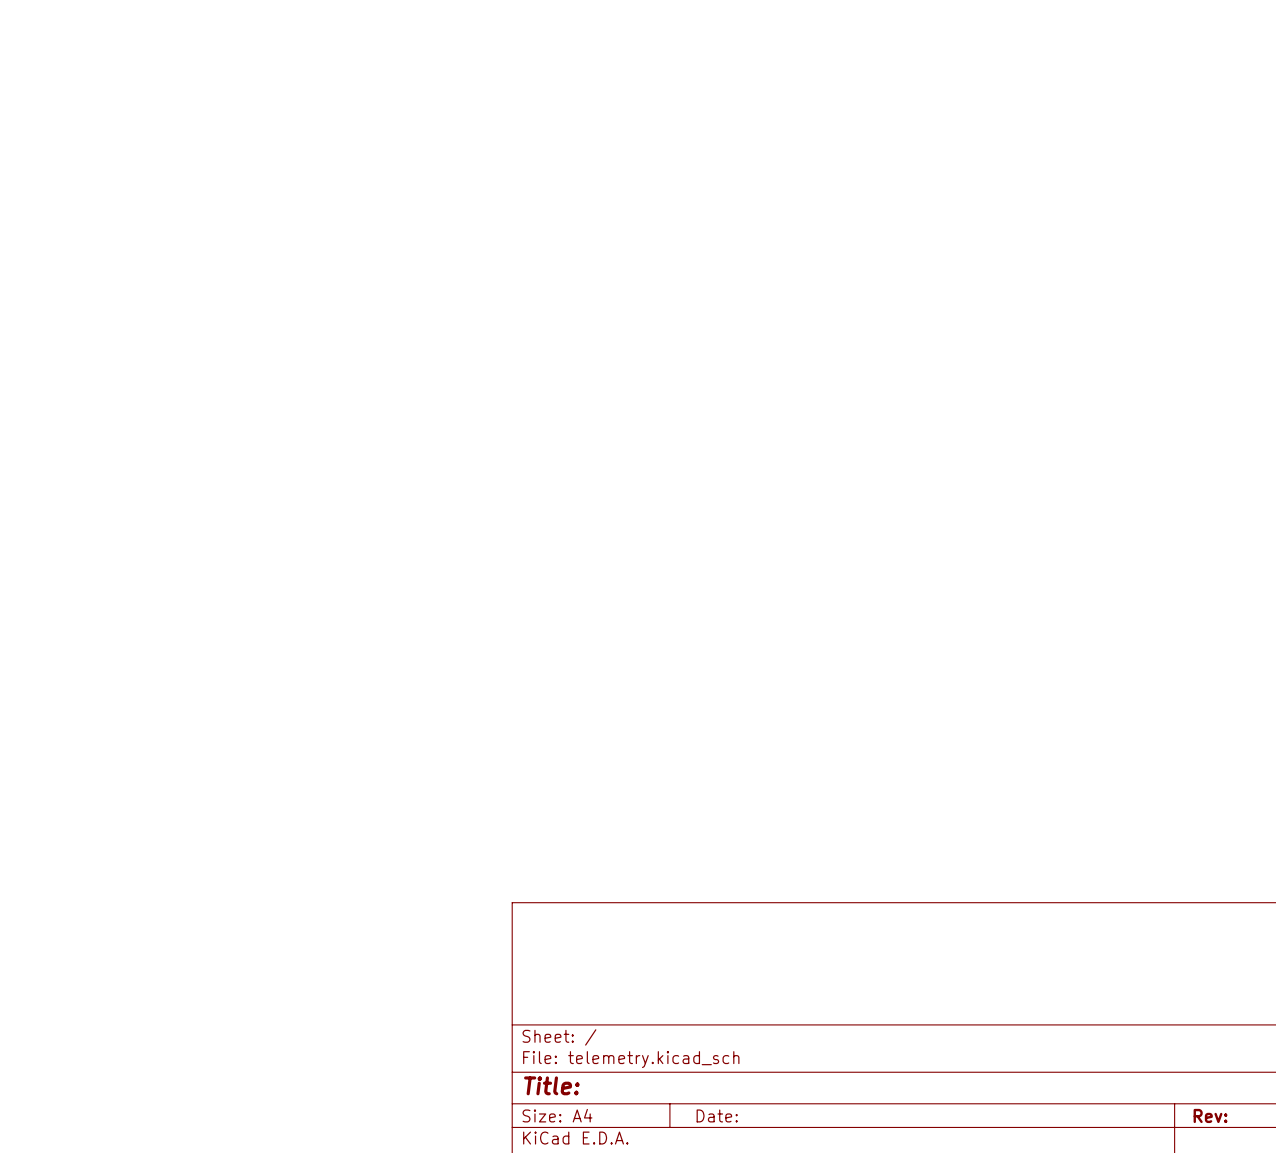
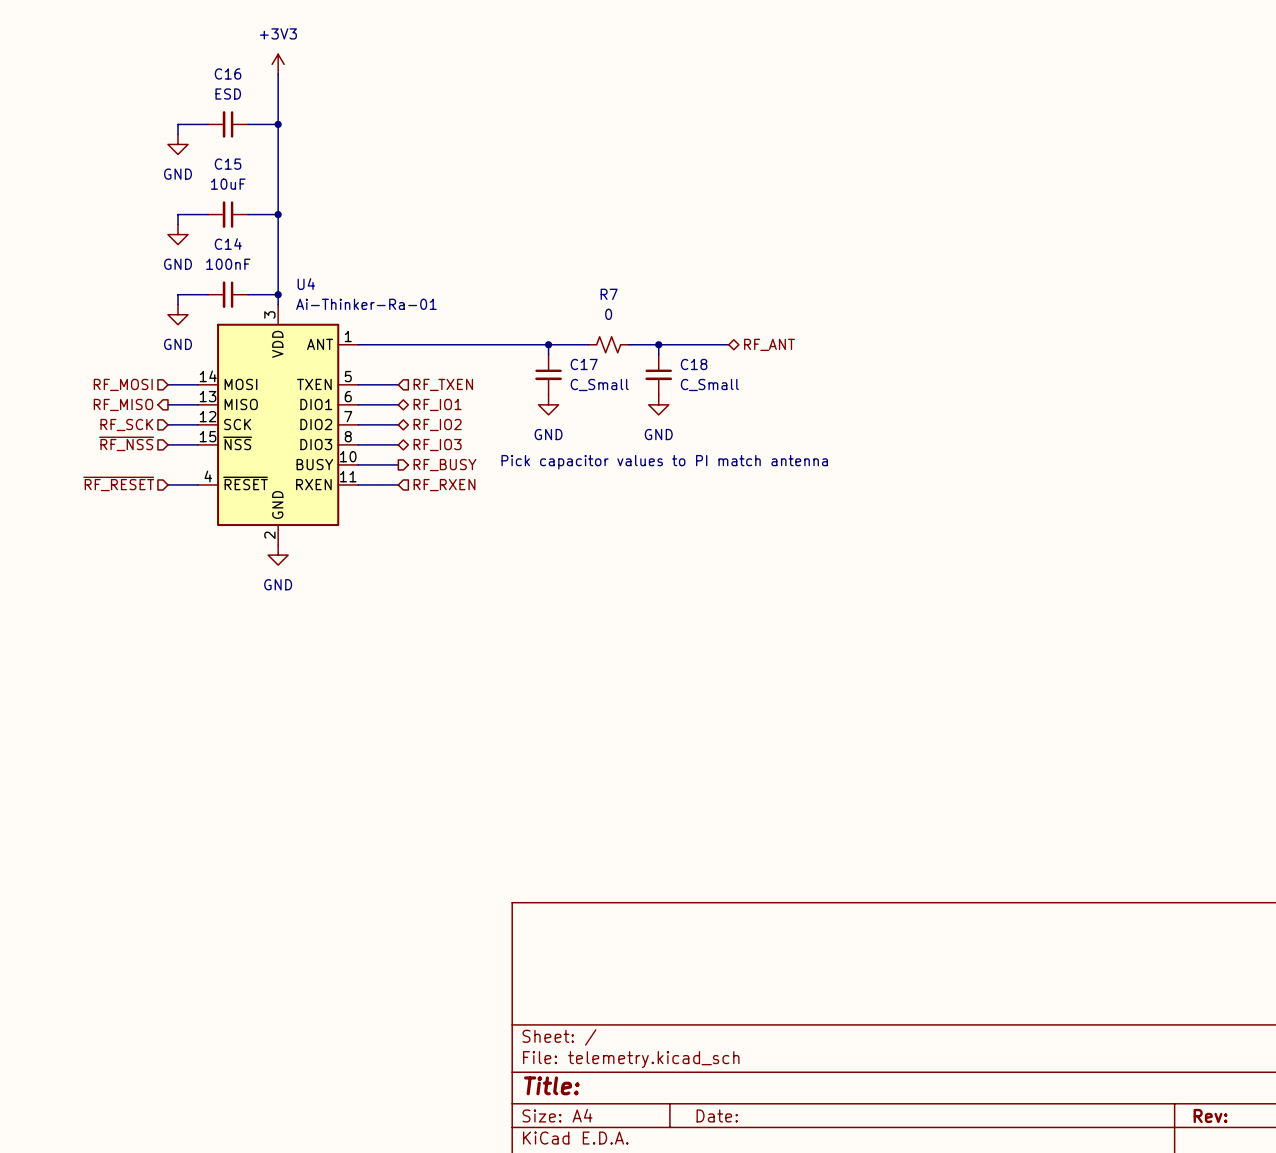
power symbol: none -> +3V3 (278, 64)
wire: none -> (278, 74) (278, 304)
wire: none -> (208, 124) (178, 124) (178, 134)
C16: none -> ESD (228, 124)
wire: none -> (248, 124) (278, 124)
junction: none -> (278, 124)
power symbol: none -> GND (178, 144)
wire: none -> (208, 214) (178, 214) (178, 224)
C15: none -> 10uF (228, 214)
wire: none -> (248, 214) (278, 214)
junction: none -> (278, 214)
power symbol: none -> GND (178, 234)
wire: none -> (208, 294) (178, 294) (178, 304)
C14: none -> 100nF (228, 294)
wire: none -> (248, 294) (278, 294)
junction: none -> (278, 294)
power symbol: none -> GND (178, 314)
wire: none -> (358, 344) (588, 344)
wire: none -> (548, 344) (548, 354)
junction: none -> (548, 344)
R7: none -> 0 (608, 344)
wire: none -> (628, 344) (728, 344)
wire: none -> (658, 344) (658, 354)
junction: none -> (658, 344)
hierarchical label: none -> RF_ANT (769, 344)
C17: none -> C_Small (548, 374)
C18: none -> C_Small (658, 374)
hierarchical label: none -> RF_MOSI (123, 384)
wire: none -> (167, 384) (198, 384)
wire: none -> (358, 384) (398, 384)
hierarchical label: none -> RF_TXEN (443, 384)
hierarchical label: none -> RF_MISO (123, 404)
wire: none -> (167, 404) (198, 404)
wire: none -> (358, 404) (398, 404)
hierarchical label: none -> RF_IO1 (437, 404)
power symbol: none -> GND (548, 404)
power symbol: none -> GND (658, 404)
hierarchical label: none -> RF_SCK (126, 424)
wire: none -> (167, 424) (198, 424)
U4: none -> Ai-Thinker-Ra-01 (278, 424)
wire: none -> (358, 424) (398, 424)
hierarchical label: none -> RF_IO2 (437, 424)
hierarchical label: none -> ~{RF_NSS} (126, 443)
wire: none -> (167, 444) (198, 444)
wire: none -> (358, 444) (398, 444)
hierarchical label: none -> RF_IO3 (437, 445)
text: none -> Pick capacitor values to PI match antenna (664, 462)
wire: none -> (358, 464) (398, 464)
hierarchical label: none -> RF_BUSY (444, 465)
hierarchical label: none -> ~{RF_RESET} (118, 483)
wire: none -> (167, 484) (198, 484)
wire: none -> (358, 484) (398, 484)
hierarchical label: none -> RF_RXEN (444, 485)
power symbol: none -> GND (278, 555)

